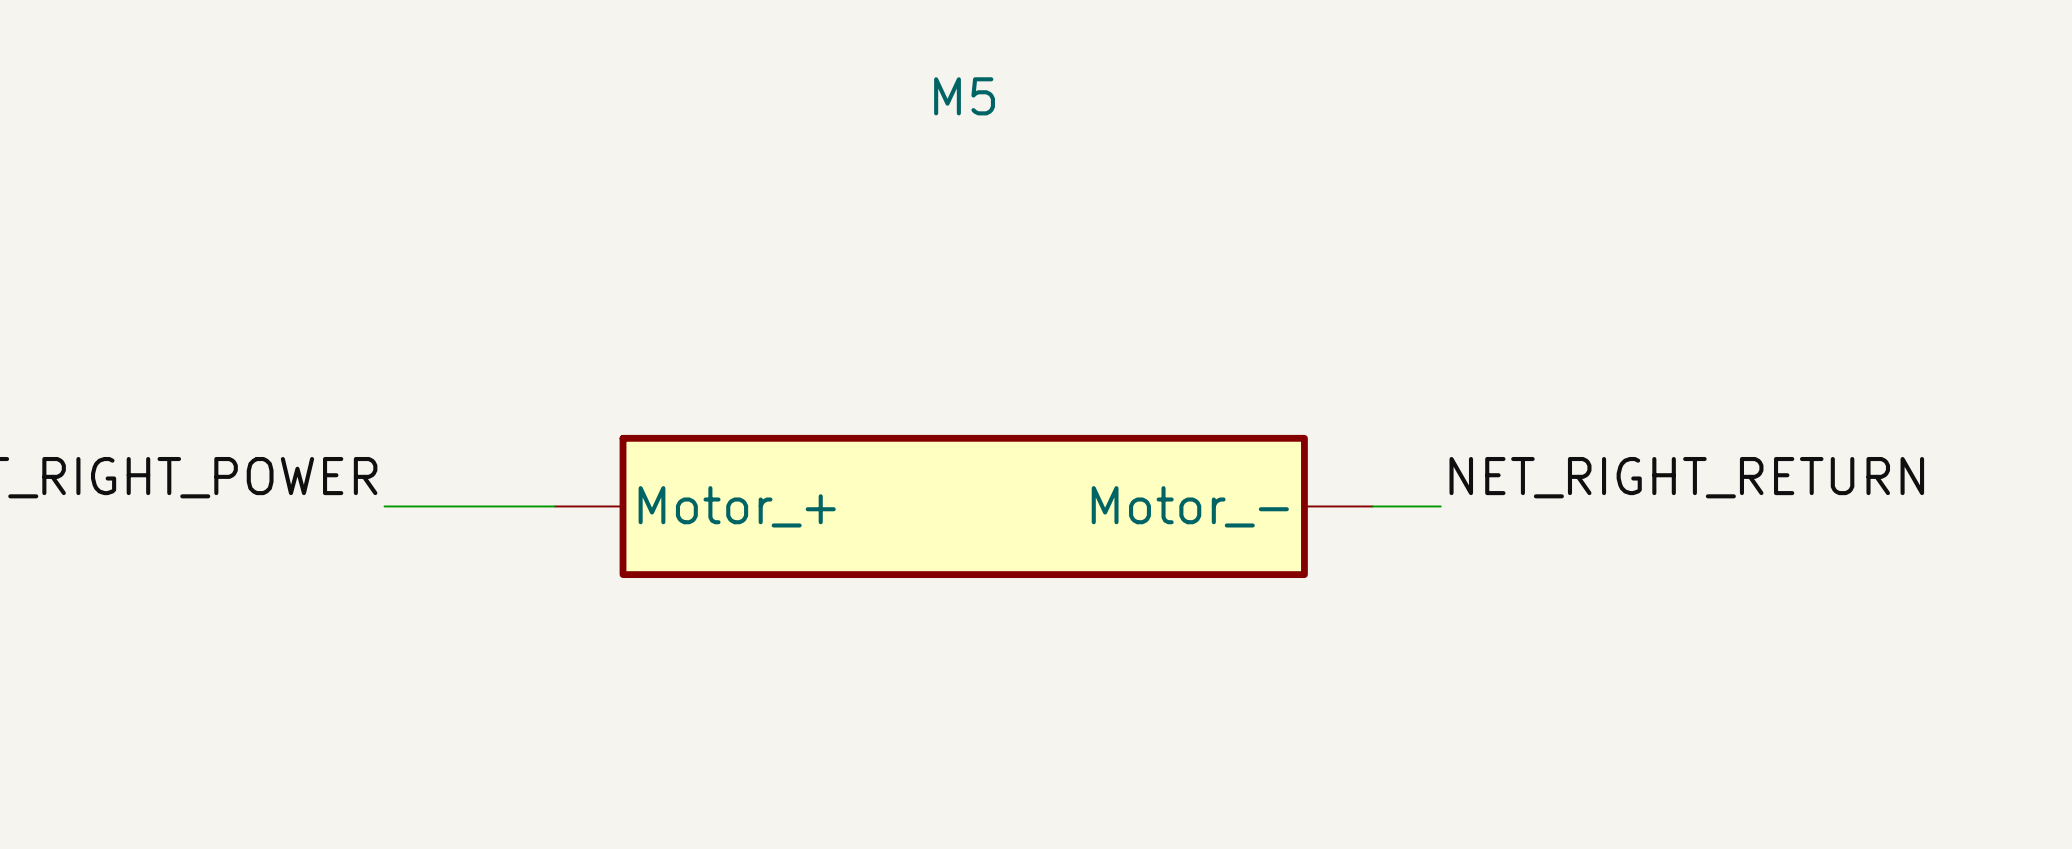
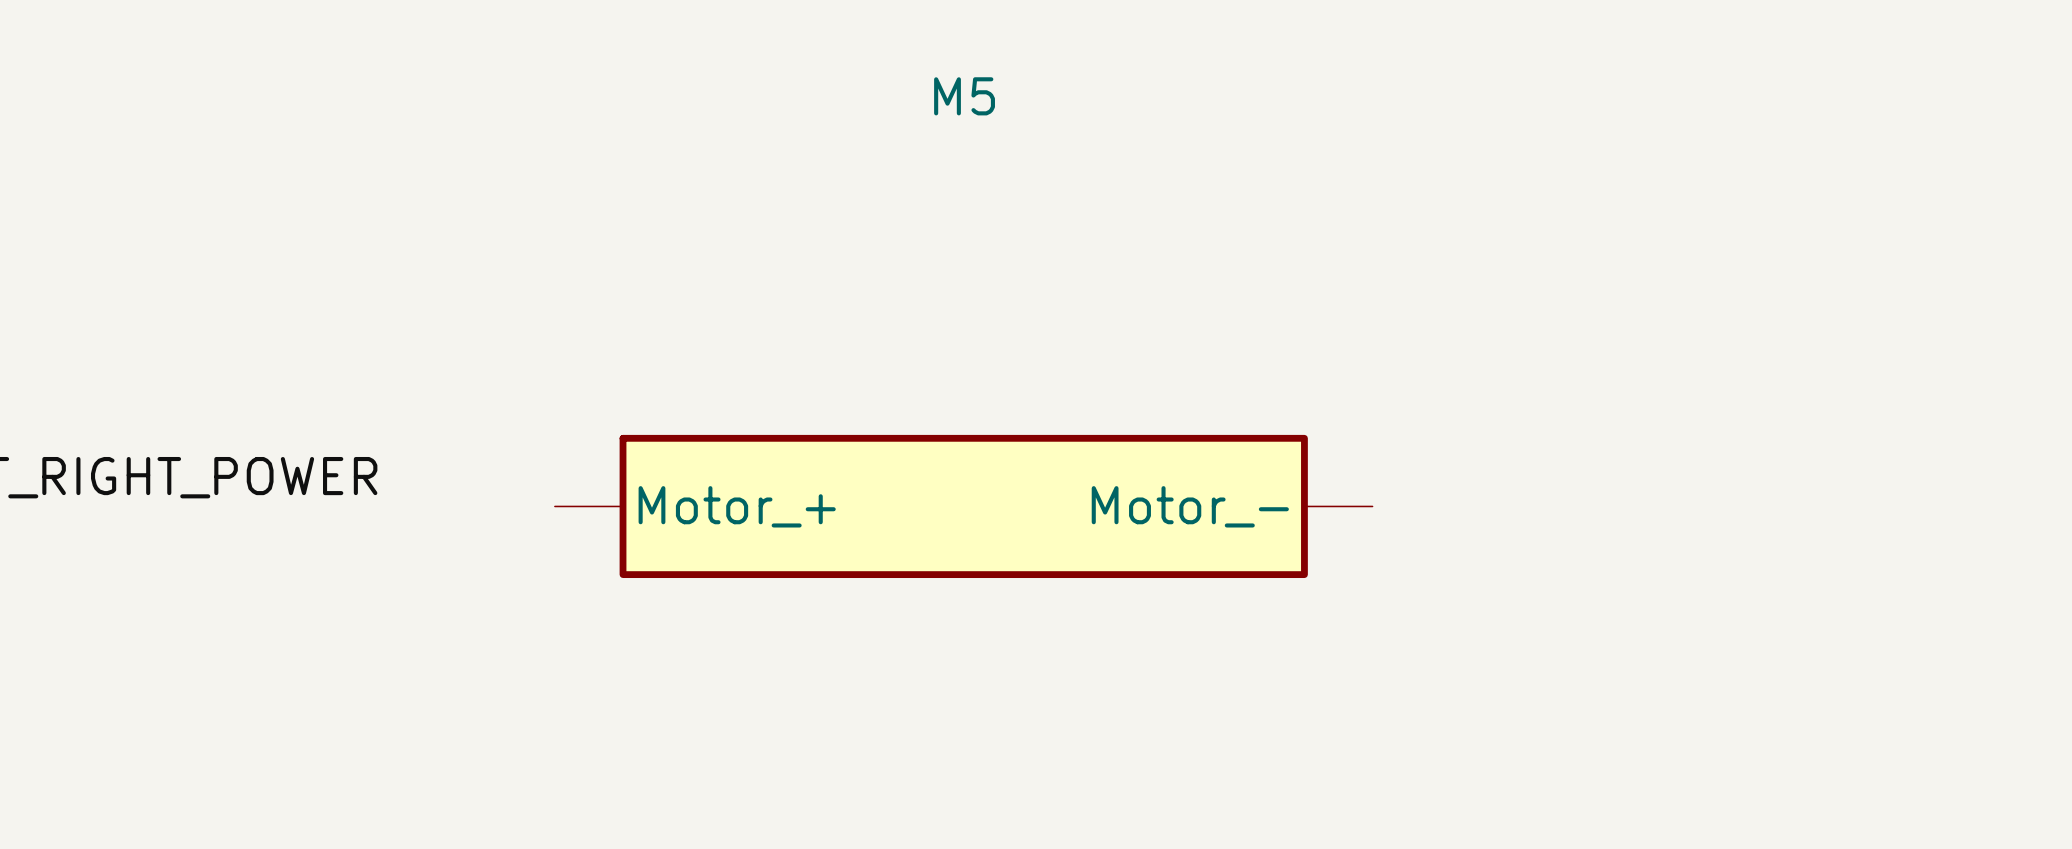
label: NET_RIGHT_RETURN (1686, 477) -> none
wire: (384, 506) (554, 506) -> none
wire: (1372, 506) (1440, 506) -> none

